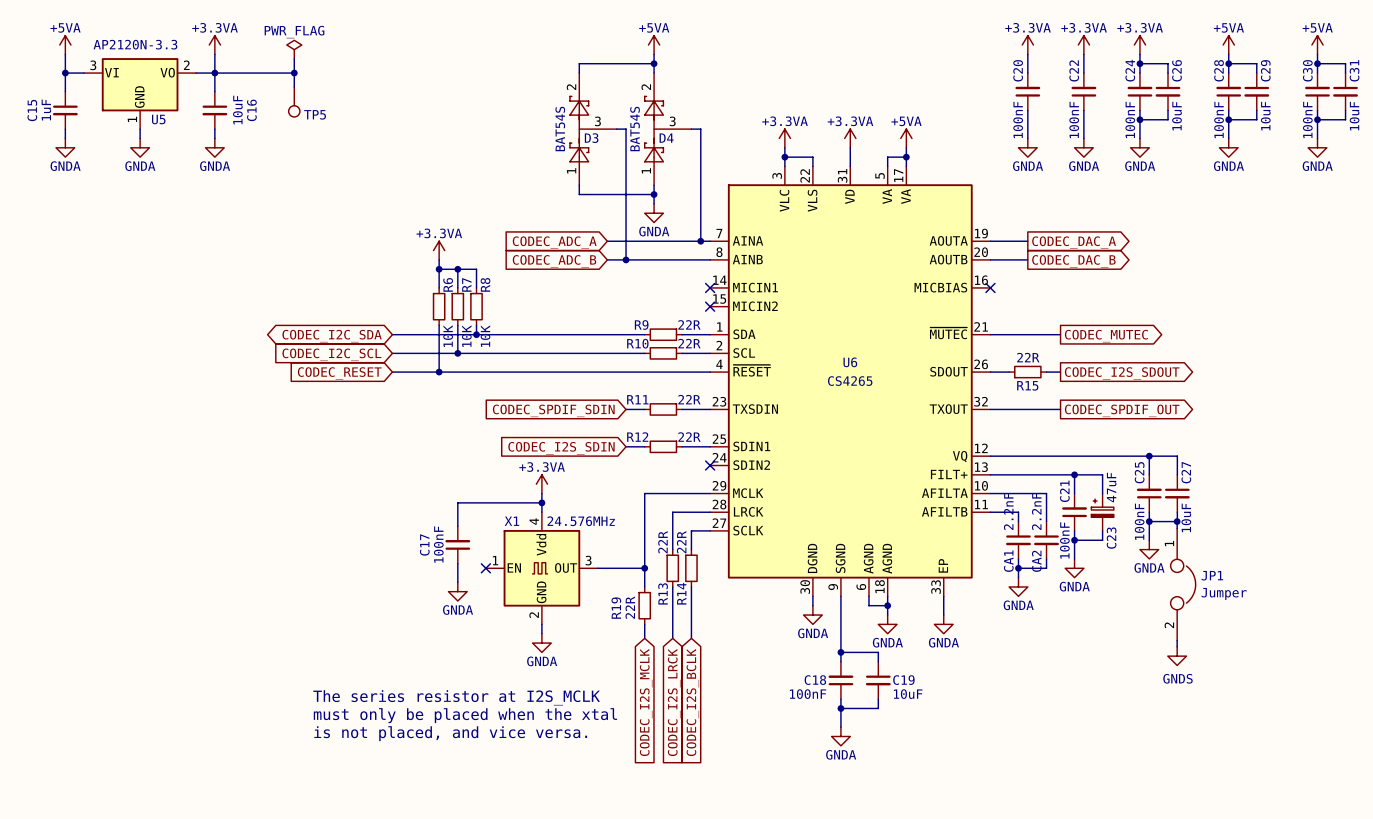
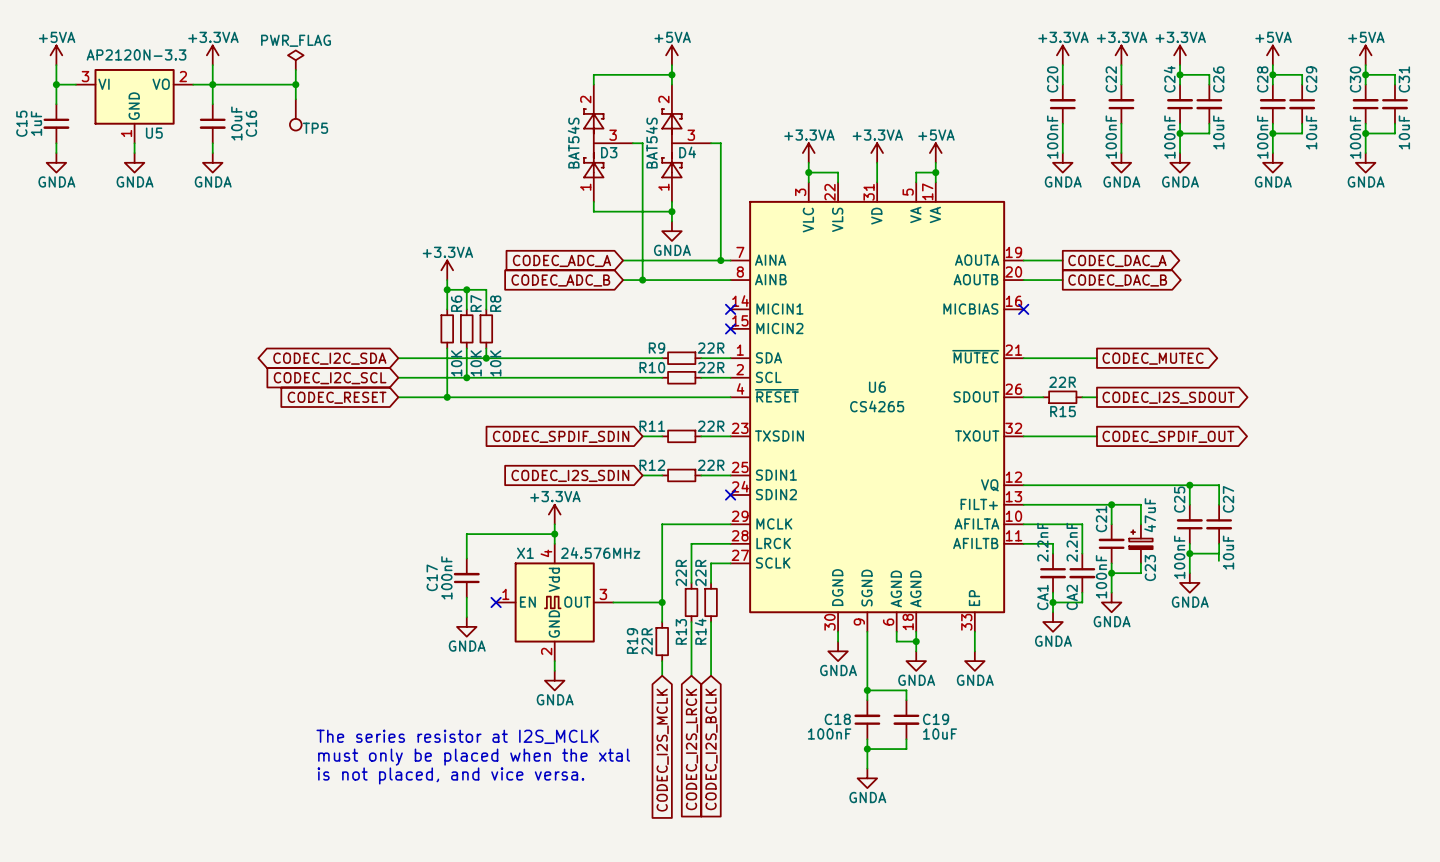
junction: (1177, 521) -> none
JP1: Jumper (1183, 584) -> none
wire: (1177, 640) (1177, 646) -> none
power symbol: GNDS (1177, 656) -> none

